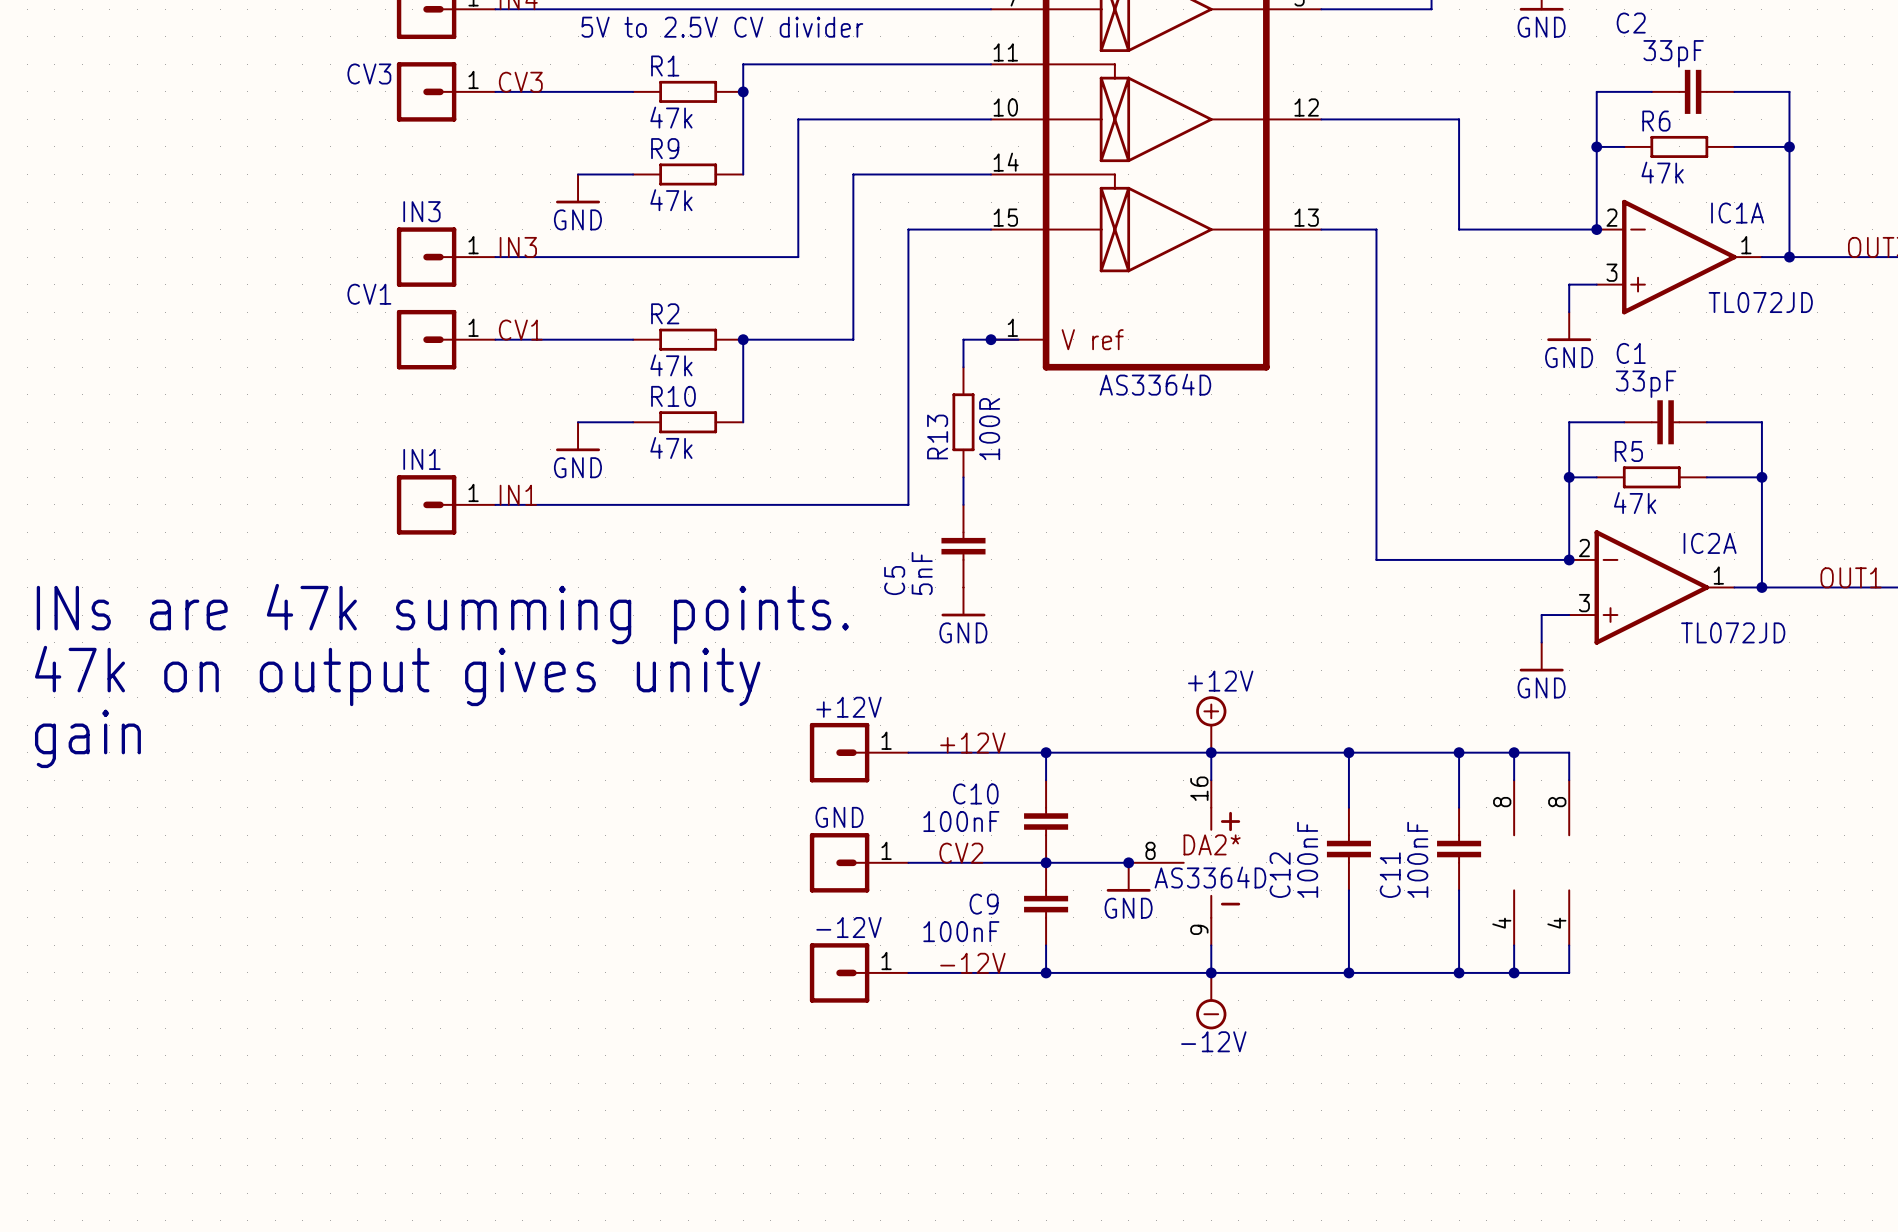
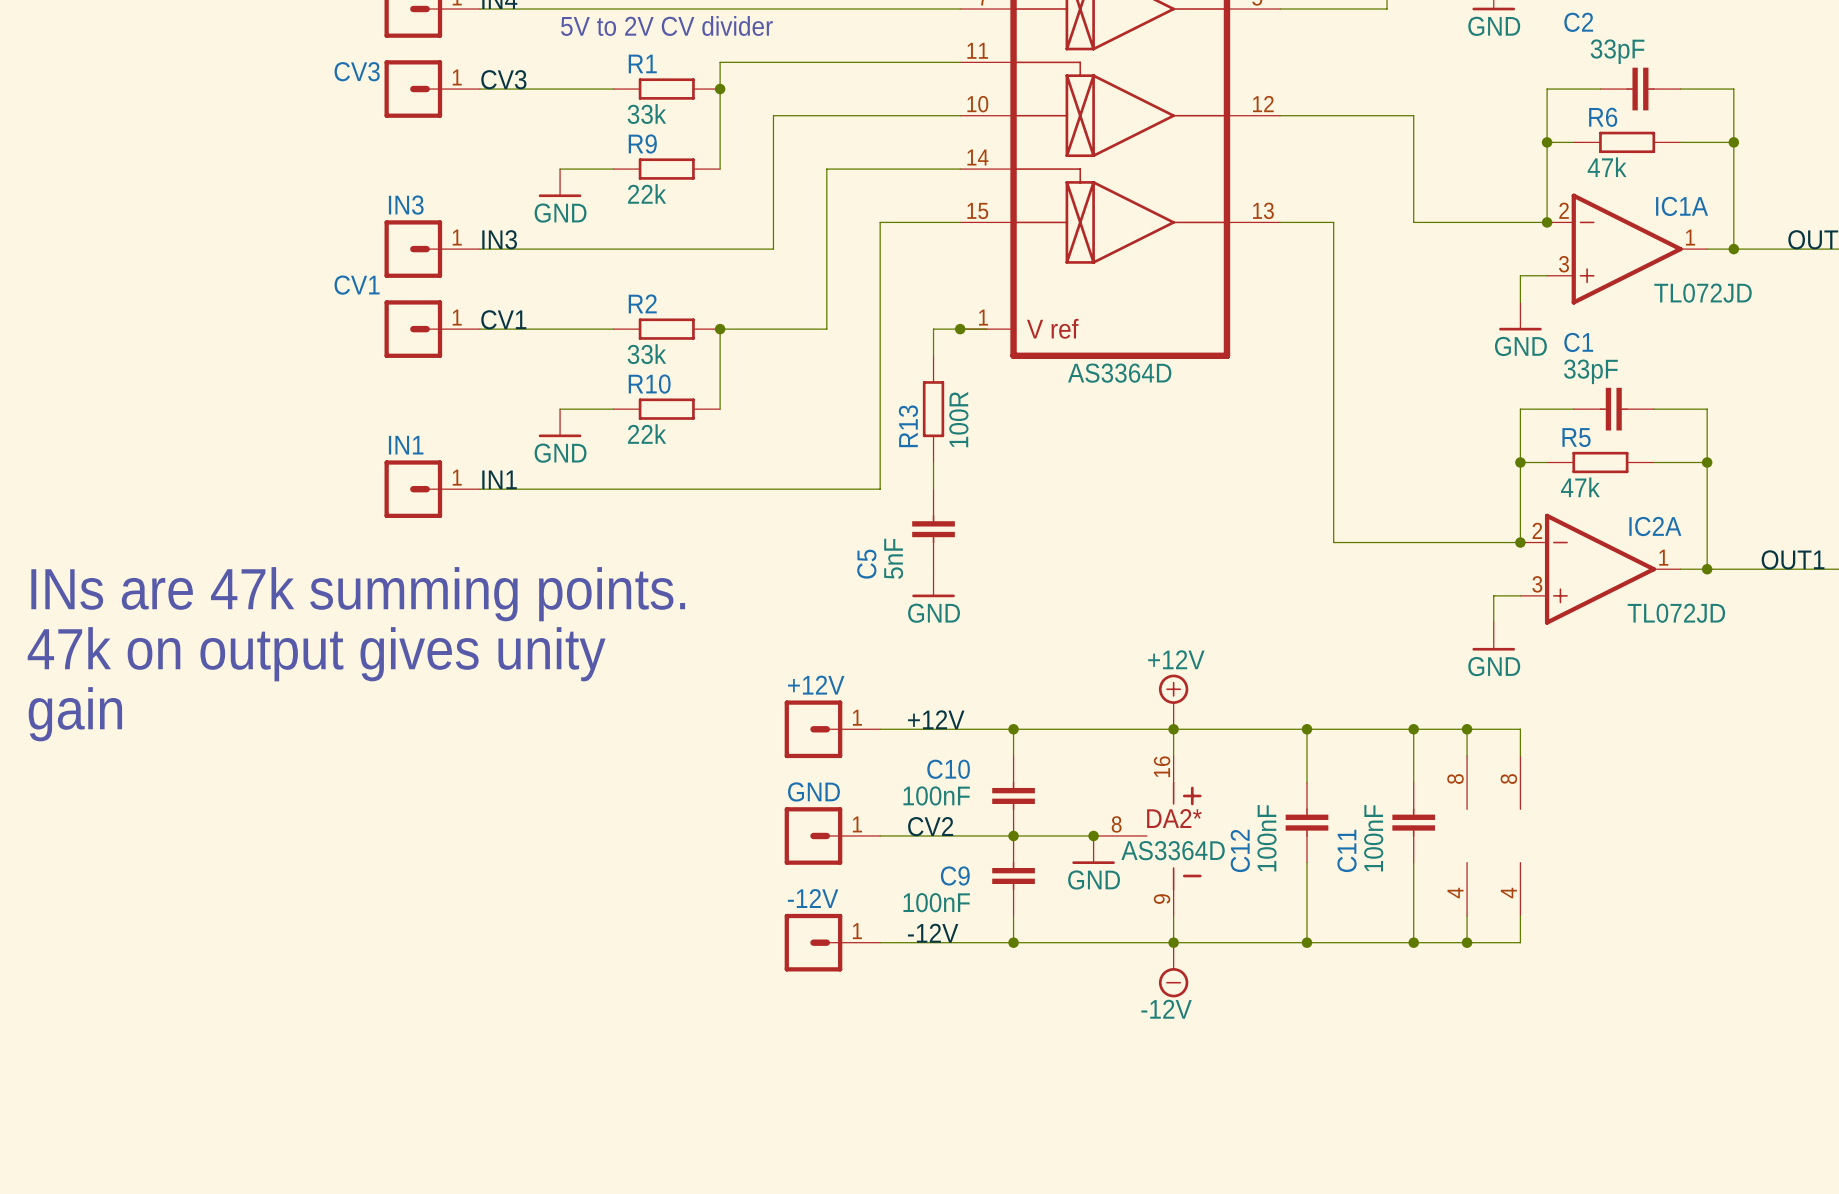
text: 5V to 2.5V CV divider (722, 27) -> 5V to 2V CV divider (666, 25)
R1 value: 47k (671, 117) -> 33k (646, 114)
R9 value: 47k (671, 200) -> 22k (647, 193)
R2 value: 47k (671, 365) -> 33k (646, 354)
R10 value: 47k (671, 447) -> 22k (647, 434)

